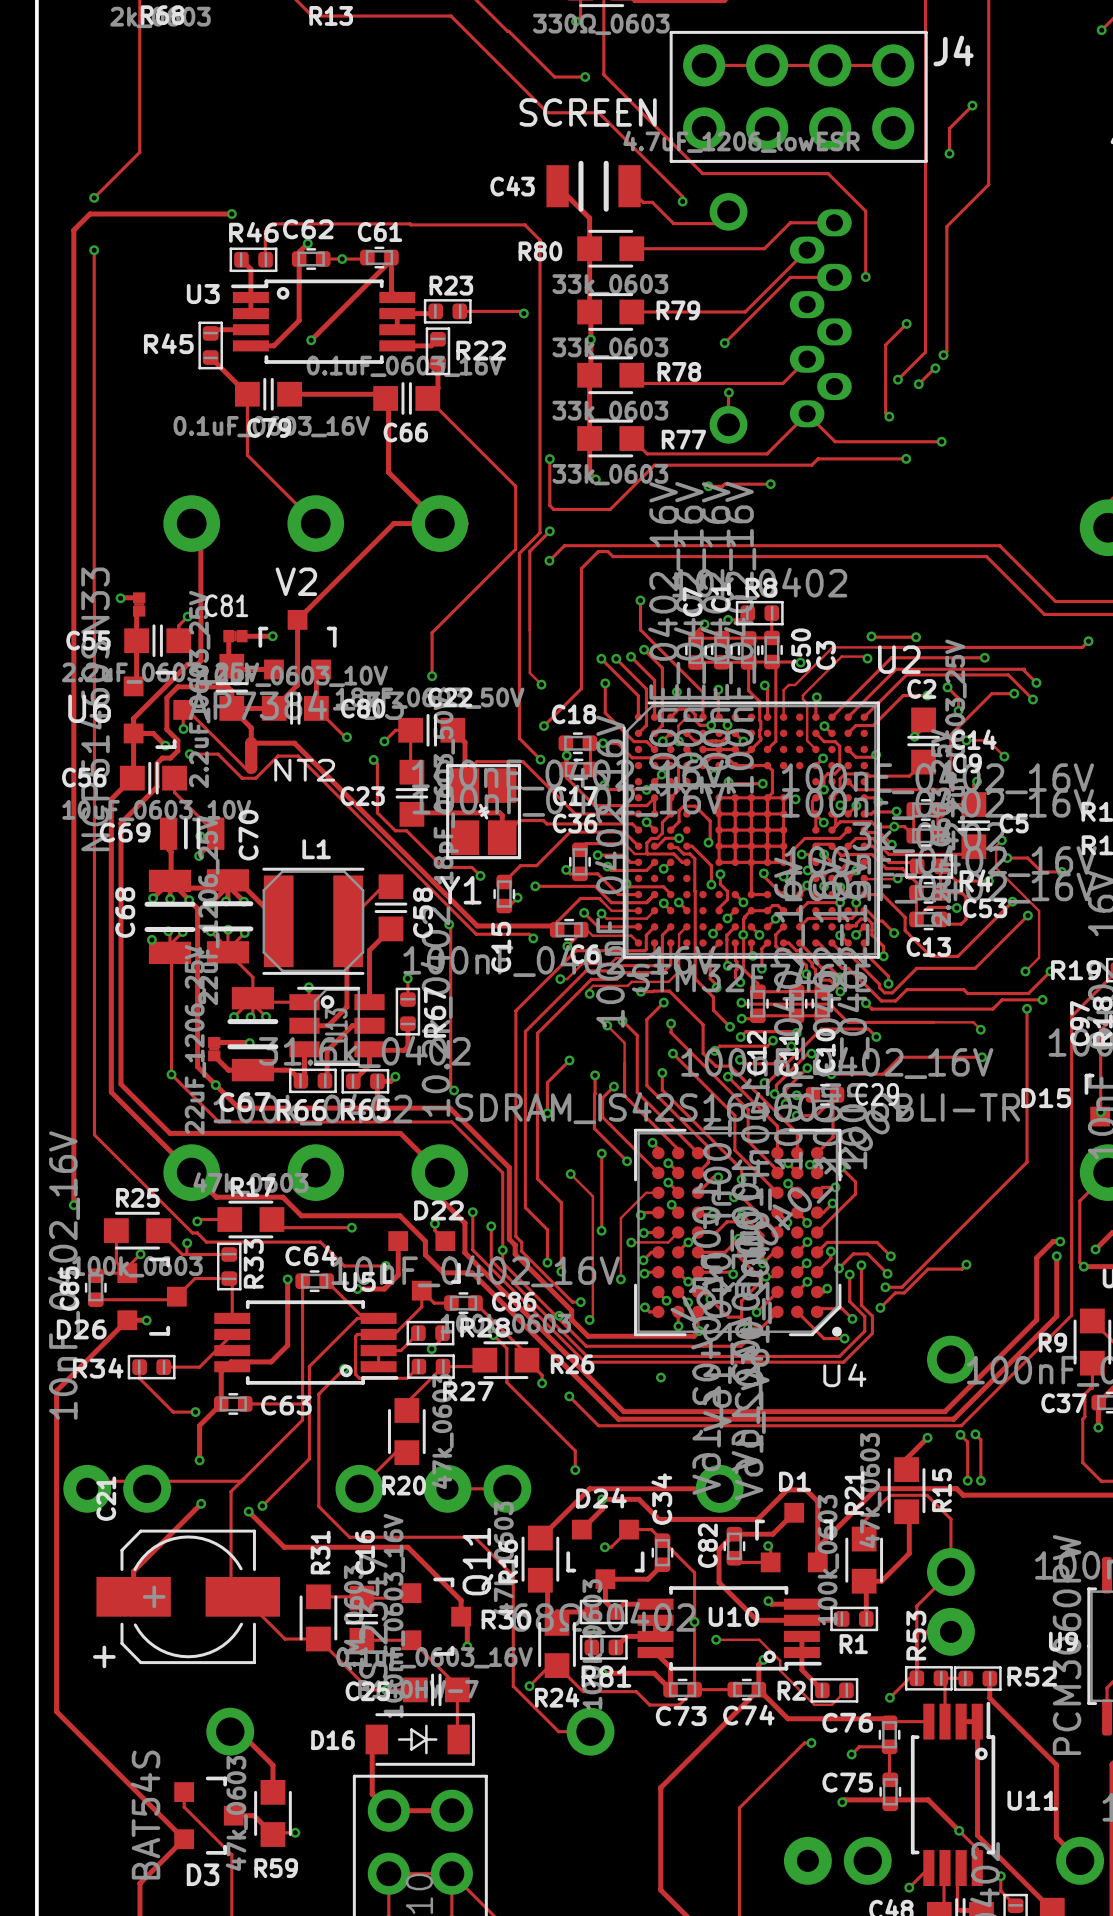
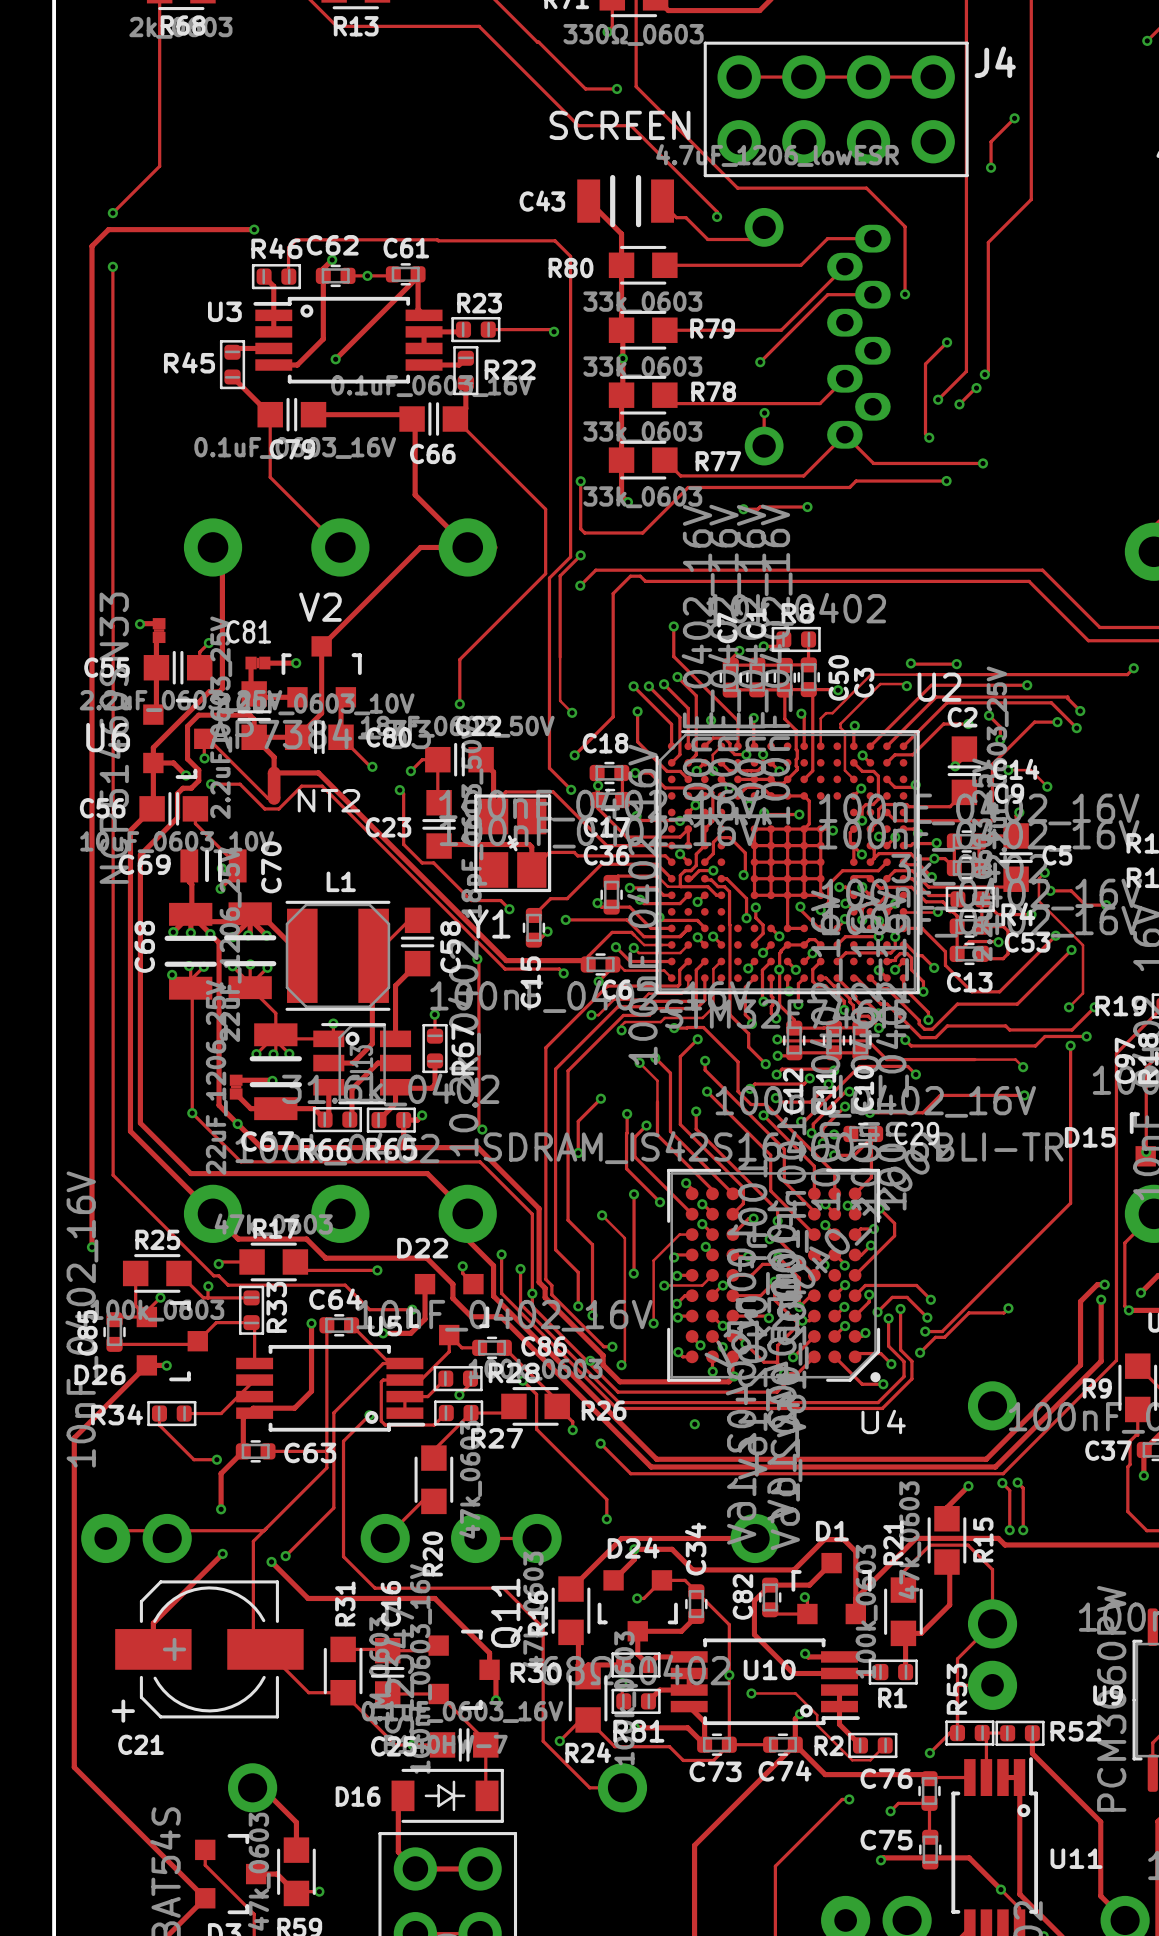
D22 name position: D22 (438, 1210) -> D22 (422, 1248)
R20 name rotation: 0° (404, 1485) -> 90° counterclockwise (432, 1554)
C21 name rotation: 0° (106, 1498) -> 90° clockwise (141, 1744)
C21 name position: C21 (106, 1498) -> C21 (141, 1744)

